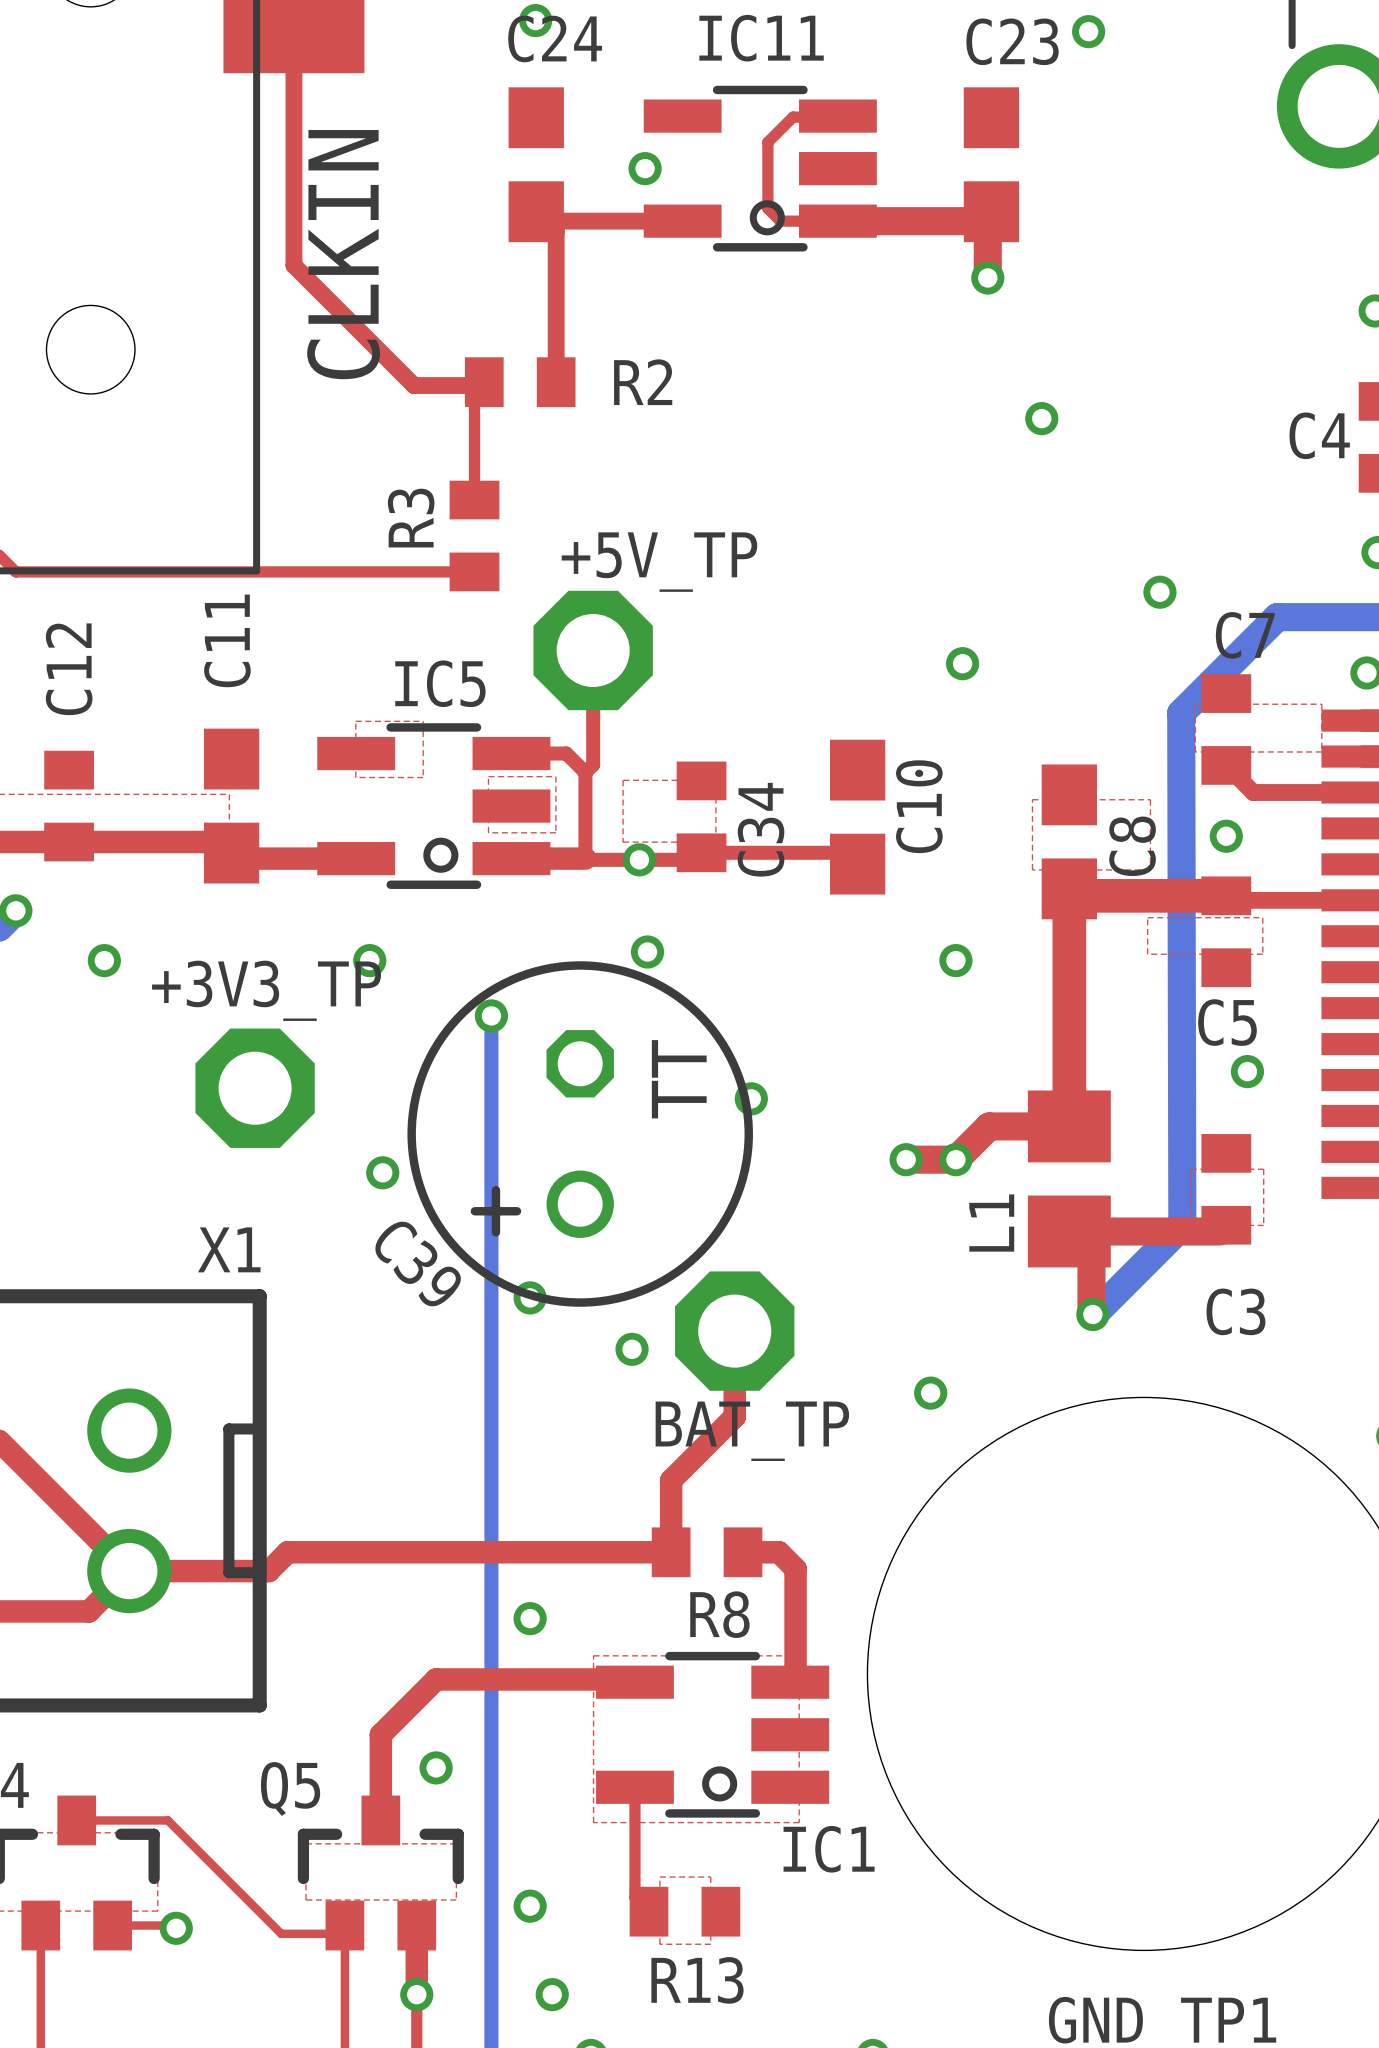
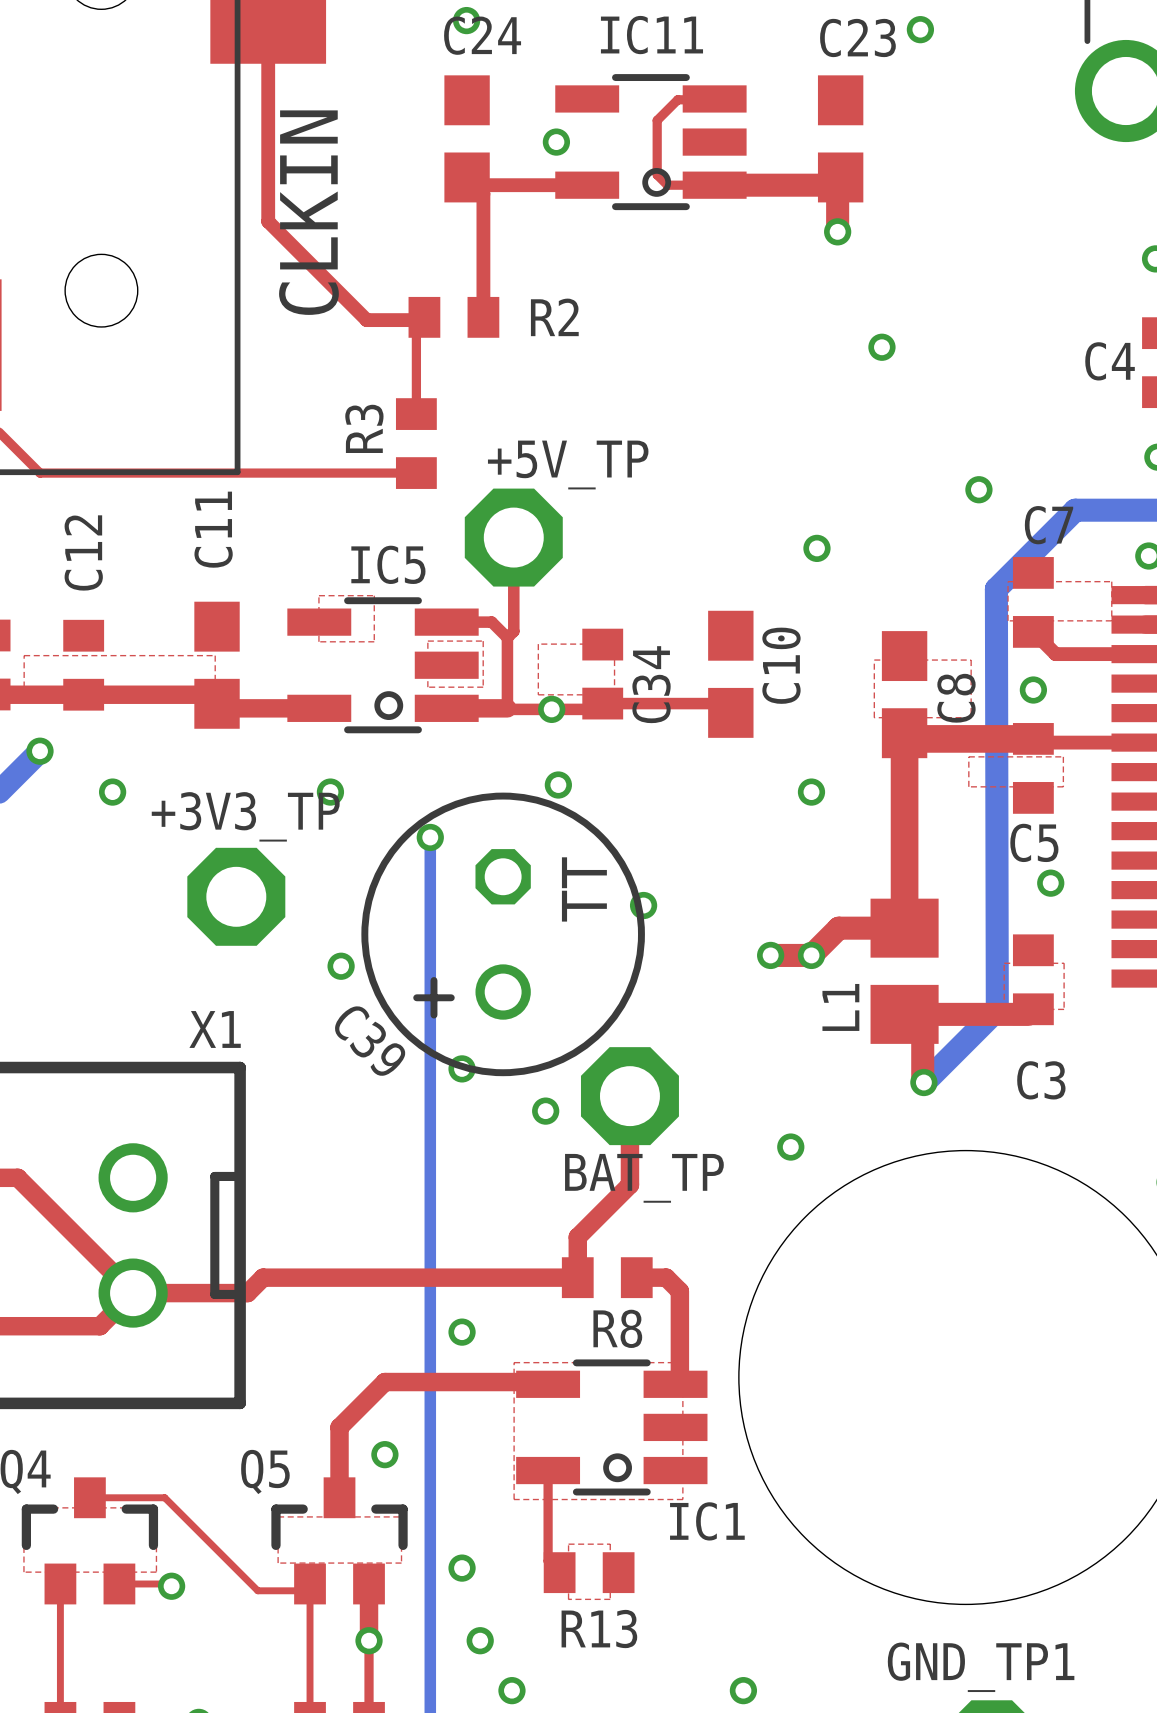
top track: (734, 1416) (671, 1480) (671, 1502) -> (629, 1166) (629, 1184) (577, 1237)

